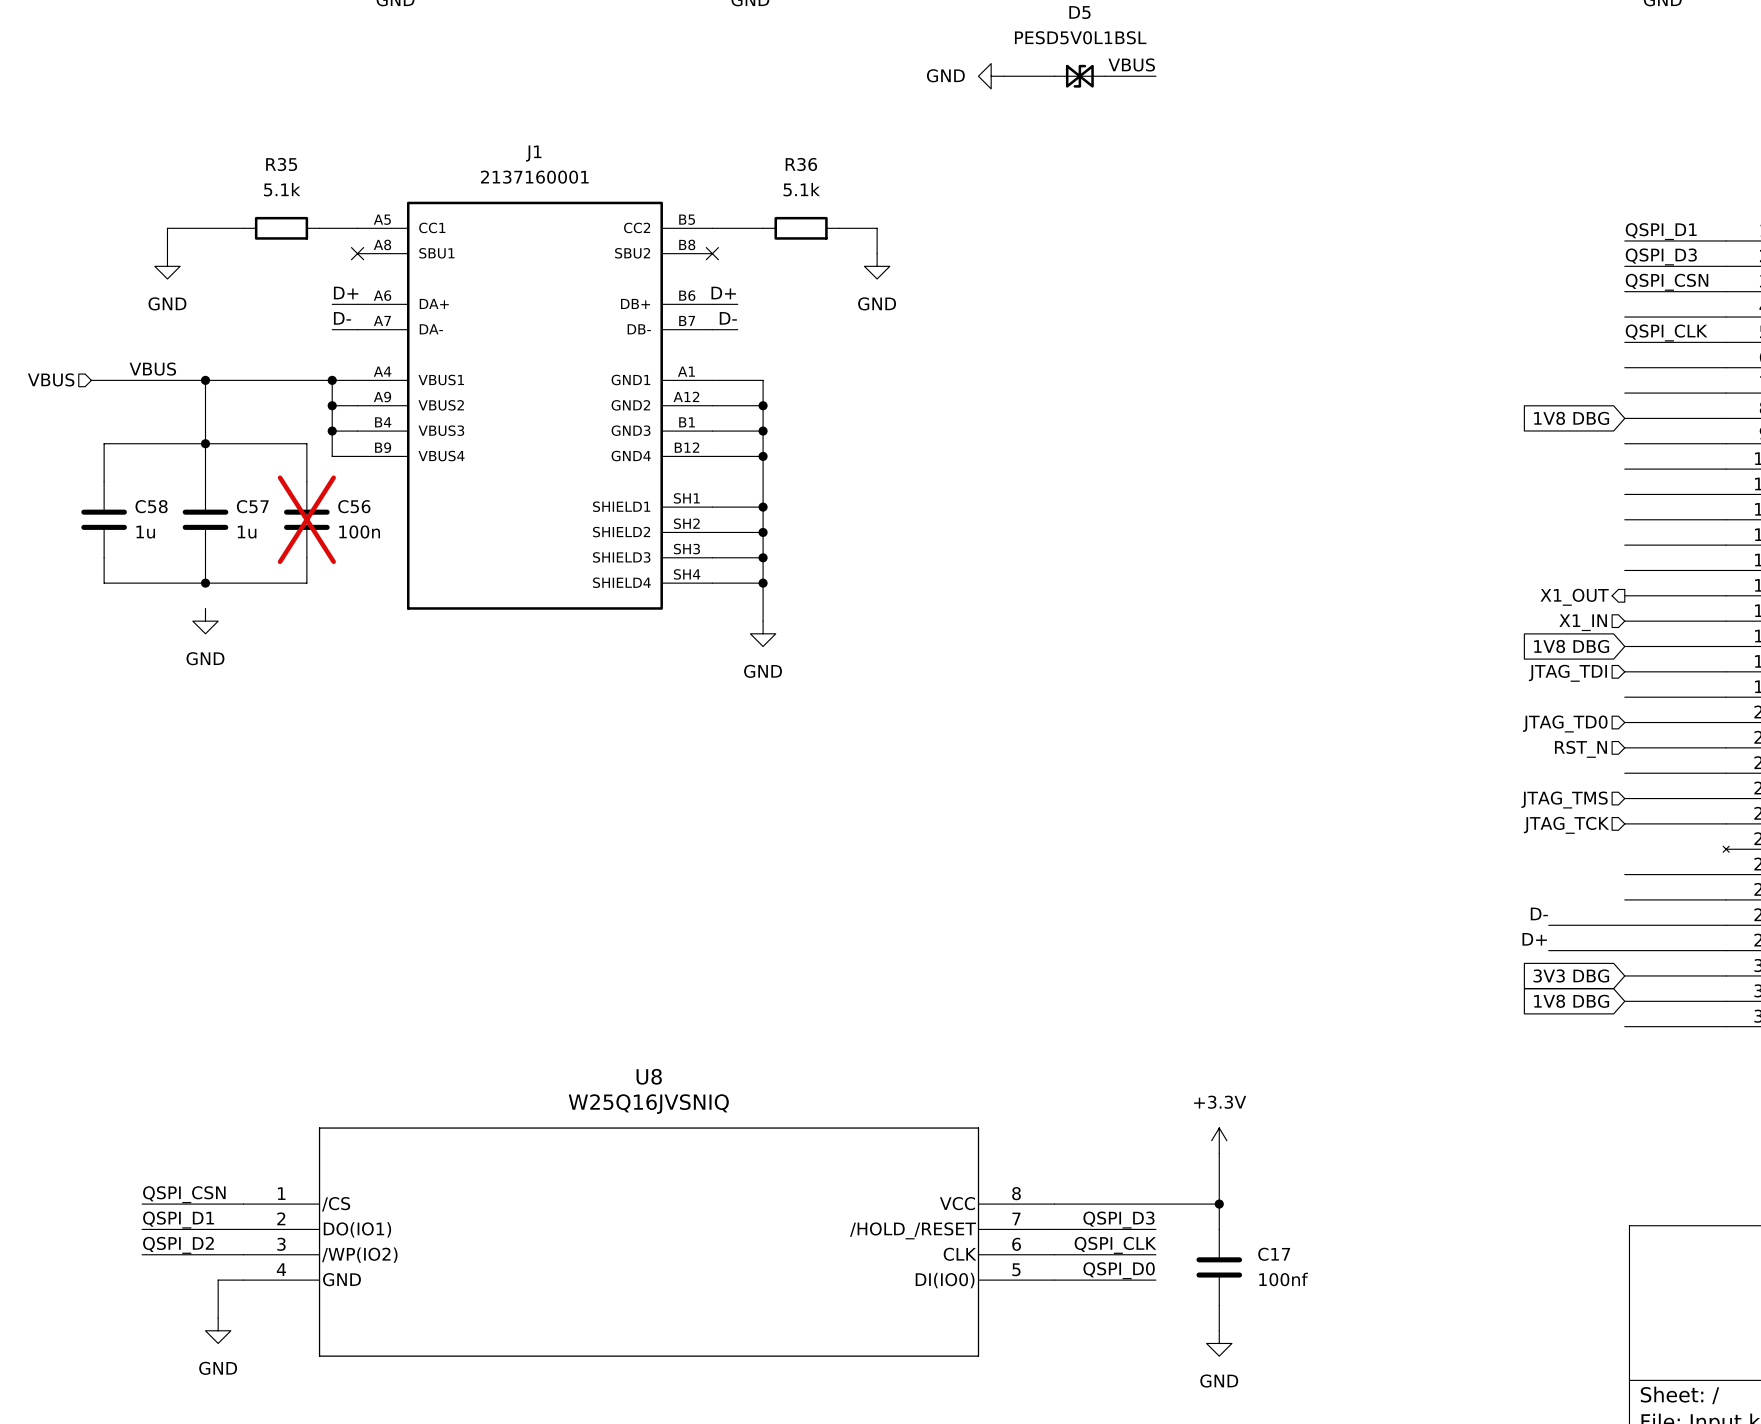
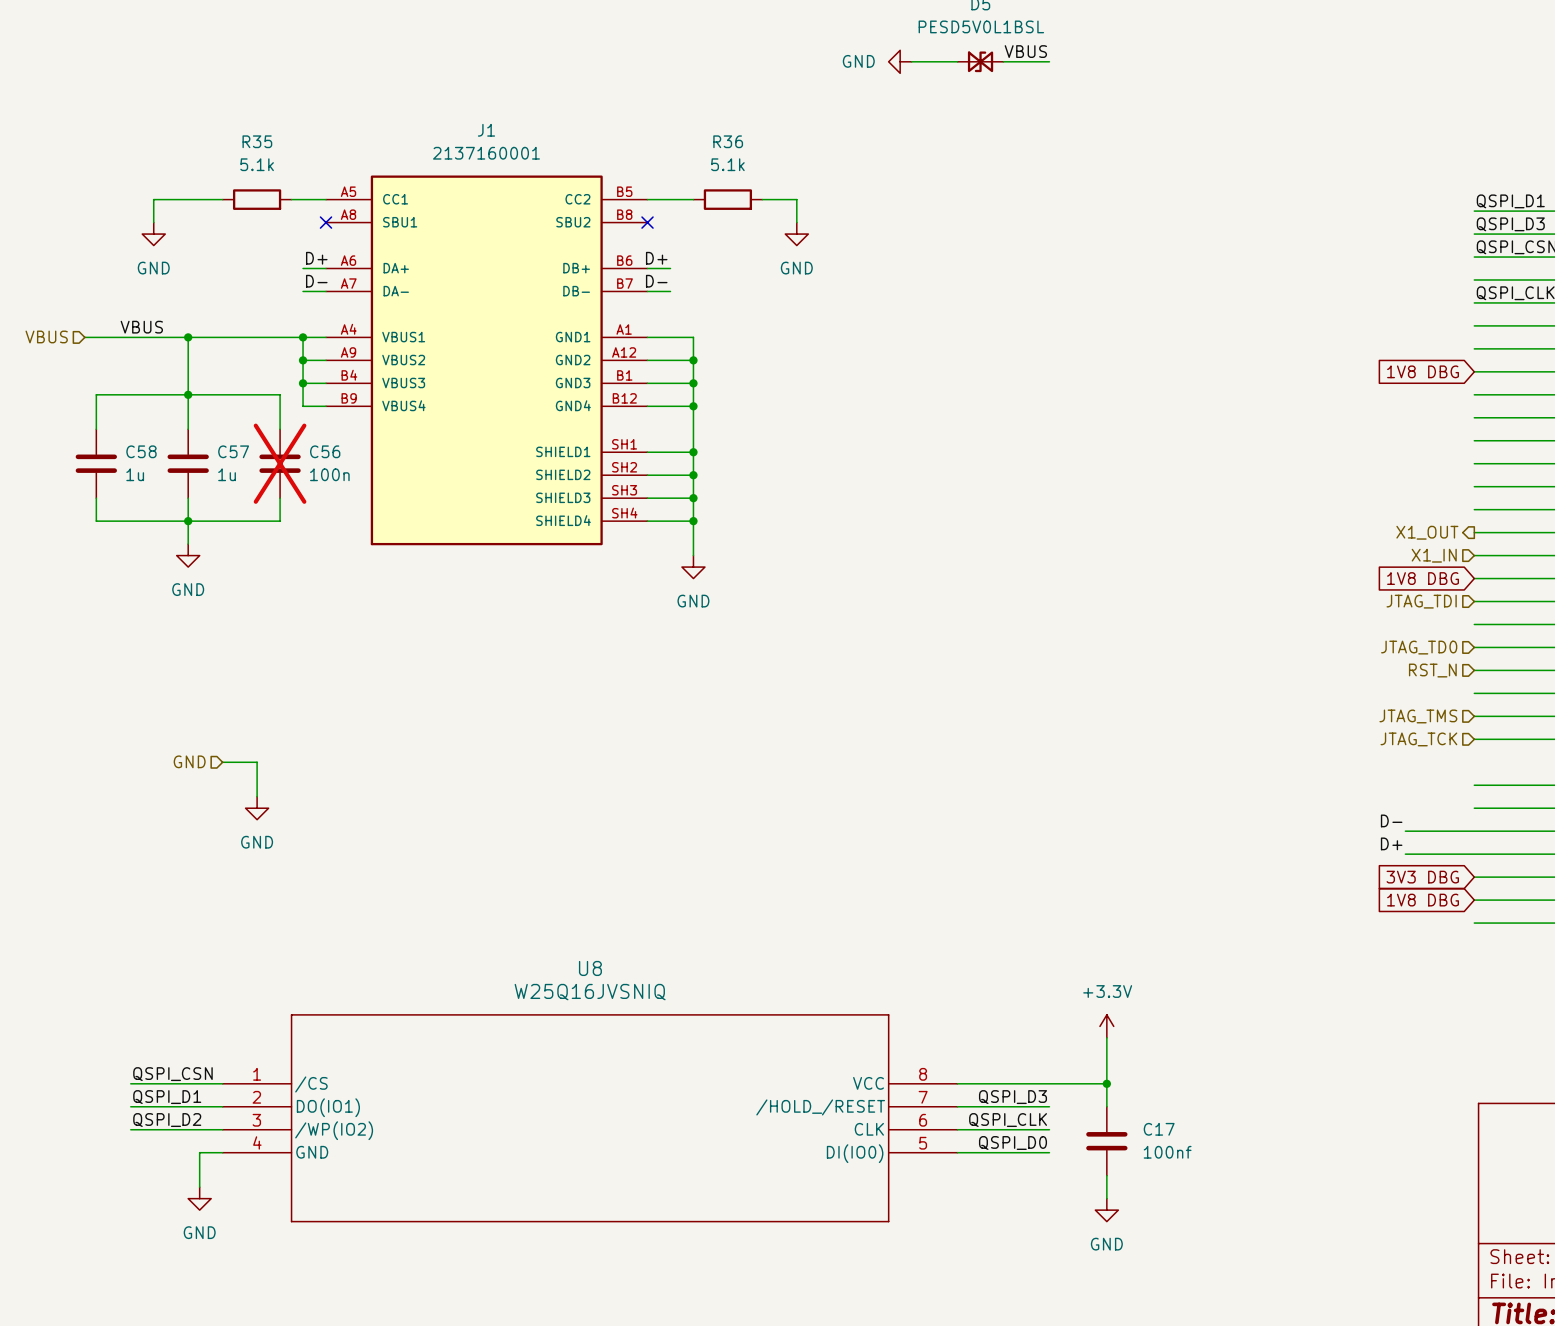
wire: none -> (188, 521) (188, 544)
hierarchical label: none -> GND (189, 761)
wire: none -> (222, 762) (257, 762) (257, 796)
power symbol: none -> GND (257, 808)

